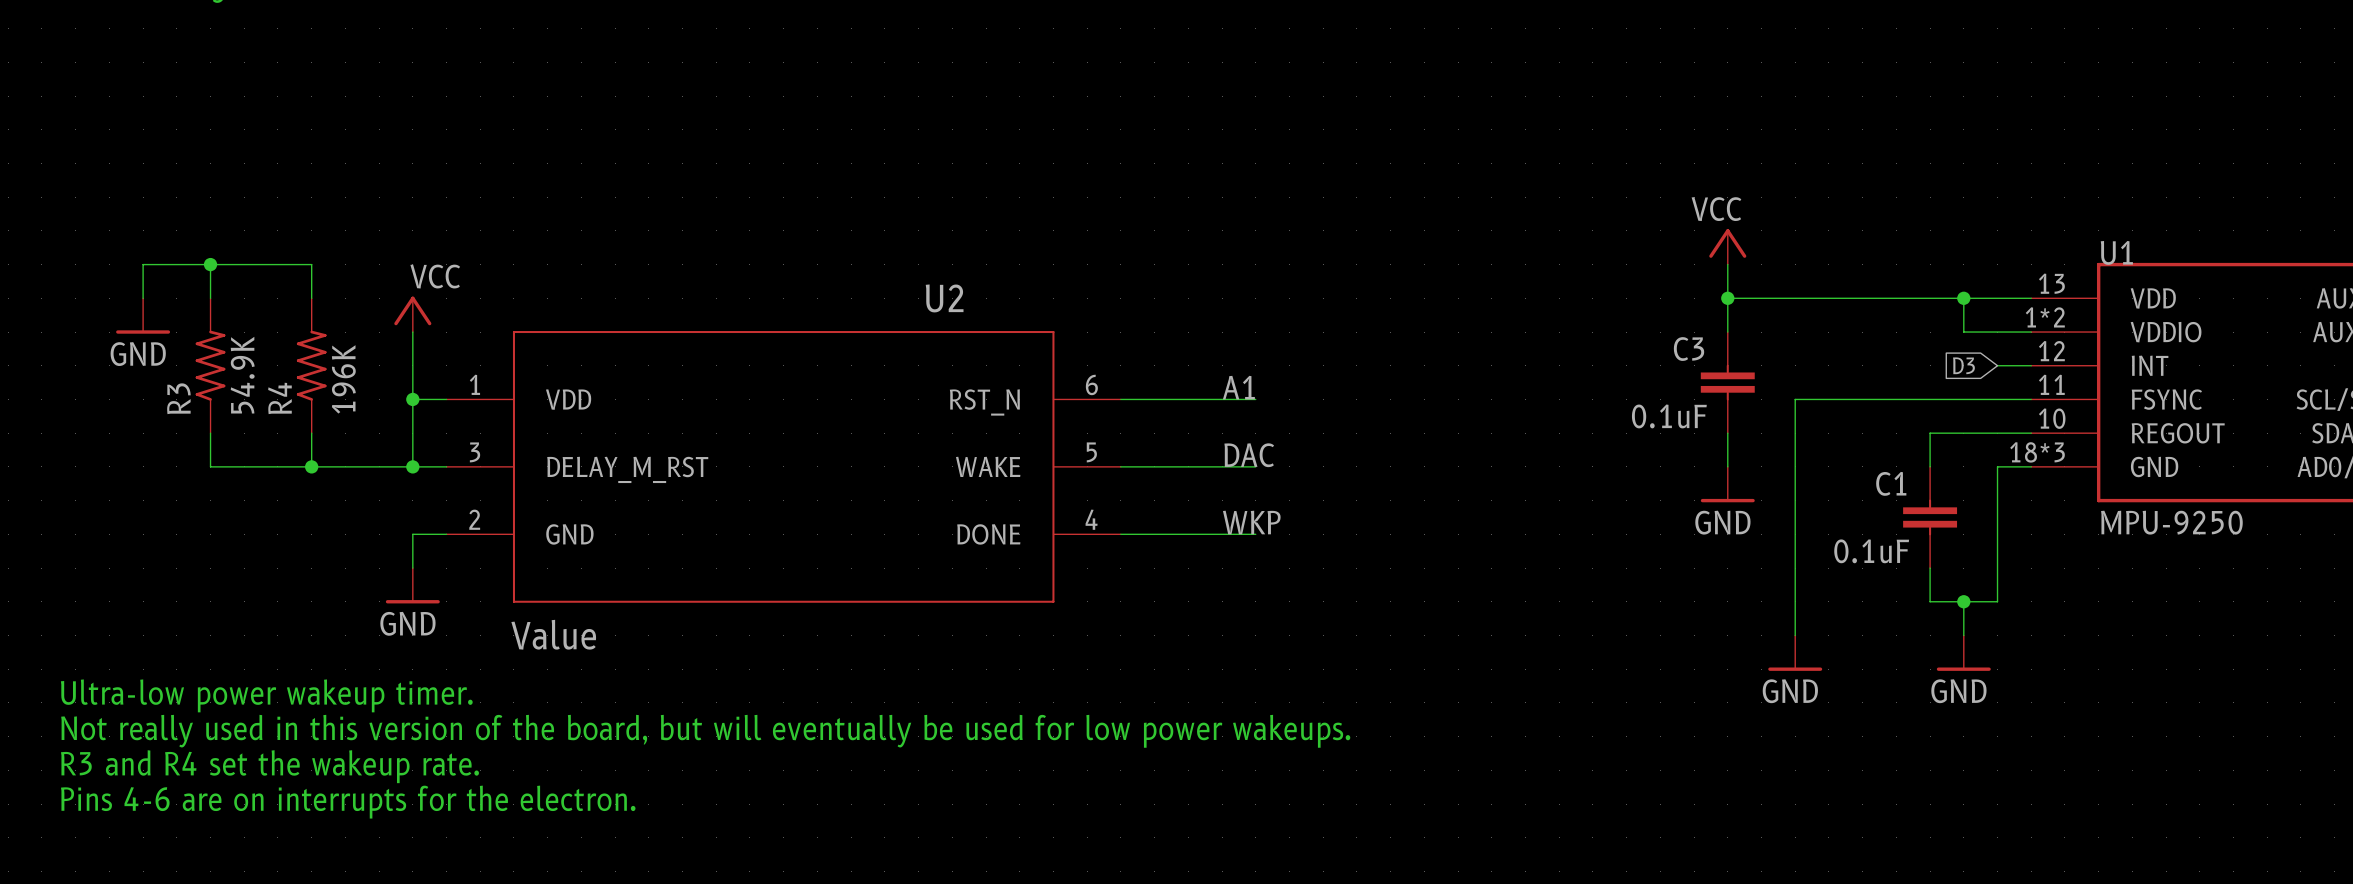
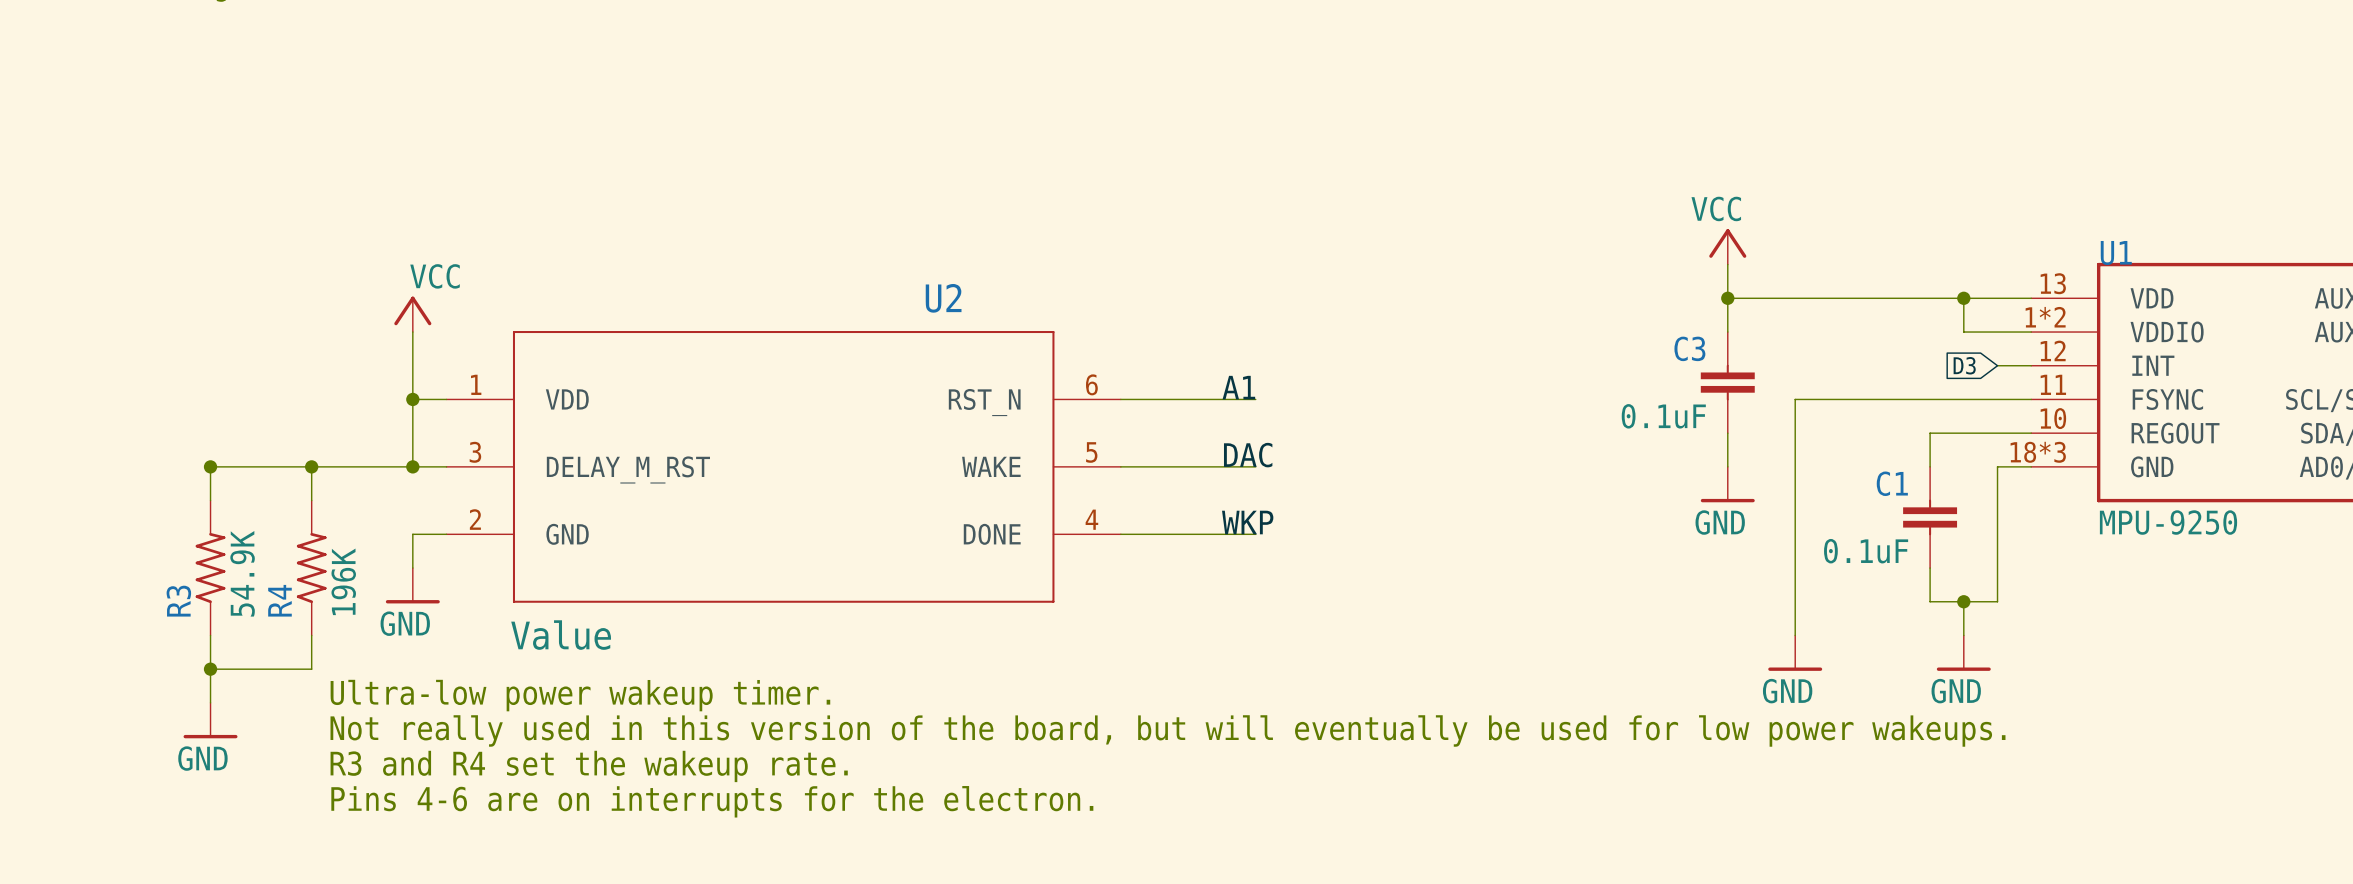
wire: (210, 264) (210, 298) -> none
junction: (210, 264) -> none
wire: (143, 298) (143, 264) (311, 264) (311, 298) -> none
power symbol: GND (143, 316) -> none
R3 position: (210, 365) -> (210, 568)
R4 position: (311, 365) -> (311, 568)
wire: (210, 433) (210, 466) -> (210, 500) (210, 466)
wire: (311, 433) (311, 466) -> (311, 500) (311, 466)
junction: none -> (210, 466)
wire: none -> (210, 635) (210, 702)
wire: none -> (311, 635) (311, 669) (210, 669)
junction: none -> (210, 669)
text position: Ultra-low power wakeup timer. (266, 695) -> Ultra-low power wakeup timer. (580, 695)
power symbol: none -> GND (210, 720)
text position: Not really used in this version of the board, but will eventually be used for low power wakeups. (705, 731) -> Not really used in this version of the board, but will eventually be used for low power wakeups. (1167, 730)
text position: R3 and R4 set the wakeup rate. (269, 766) -> R3 and R4 set the wakeup rate. (589, 766)
text position: Pins 4-6 are on interrupts for the electron. (348, 802) -> Pins 4-6 are on interrupts for the electron. (712, 801)

